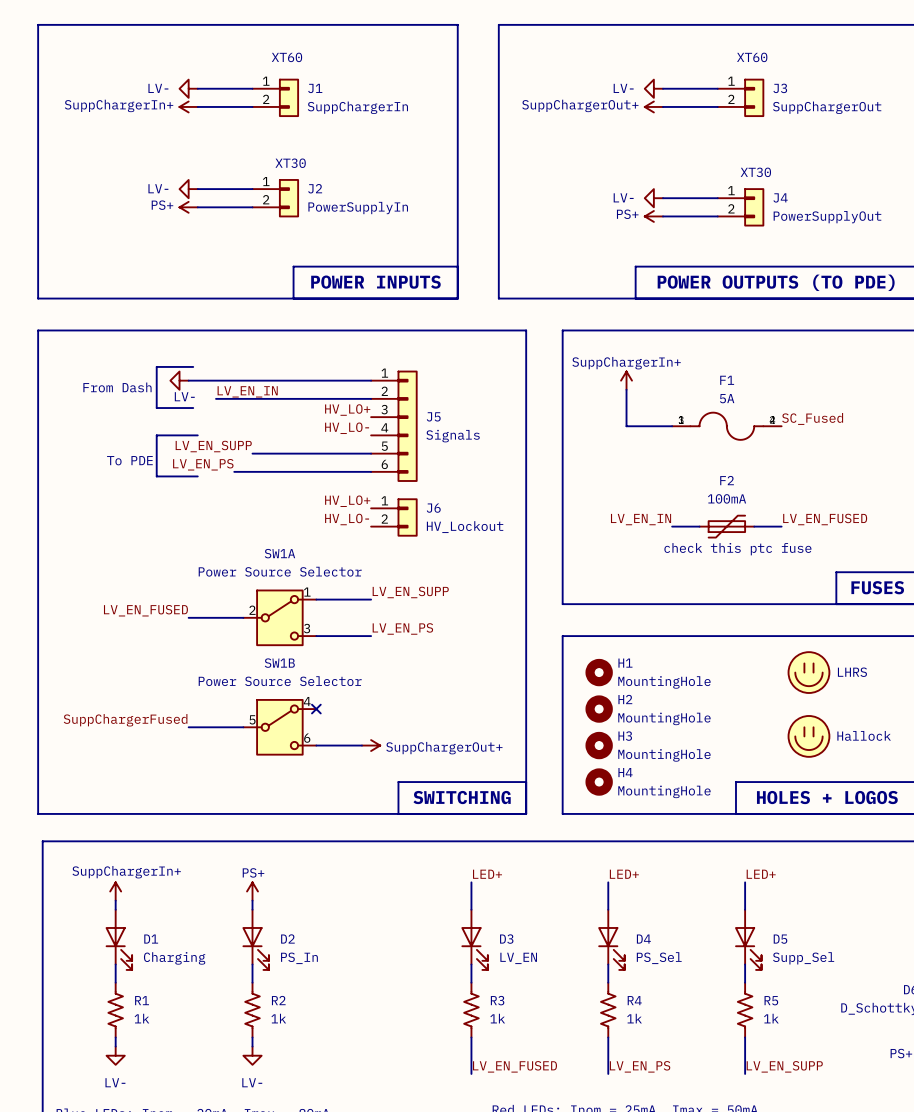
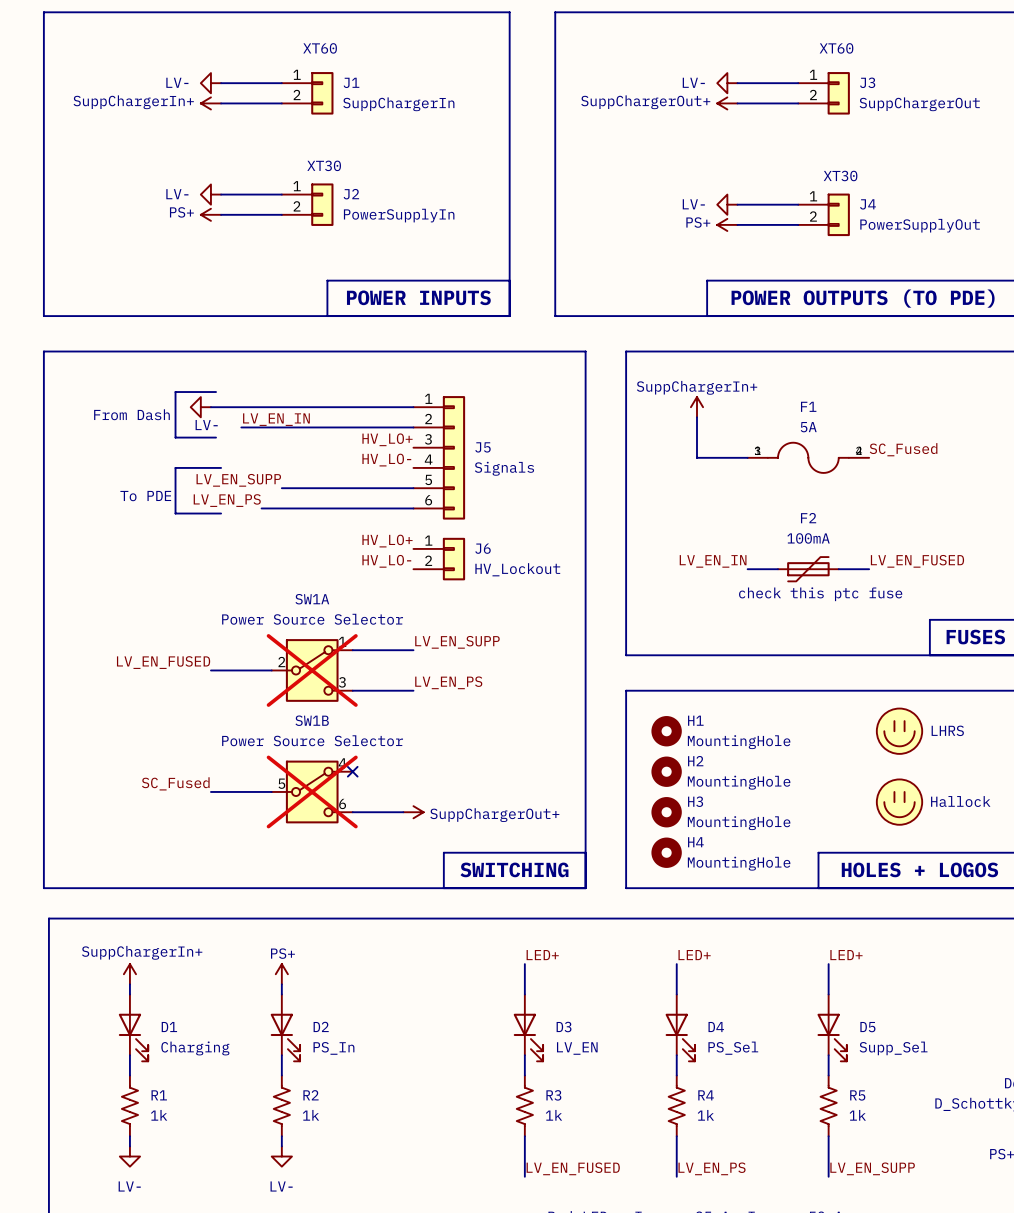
SW1A do-not-place cross: none -> (312, 670)
label: SuppChargerFused (125, 720) -> SC_Fused (175, 783)
SW1B do-not-place cross: none -> (312, 791)

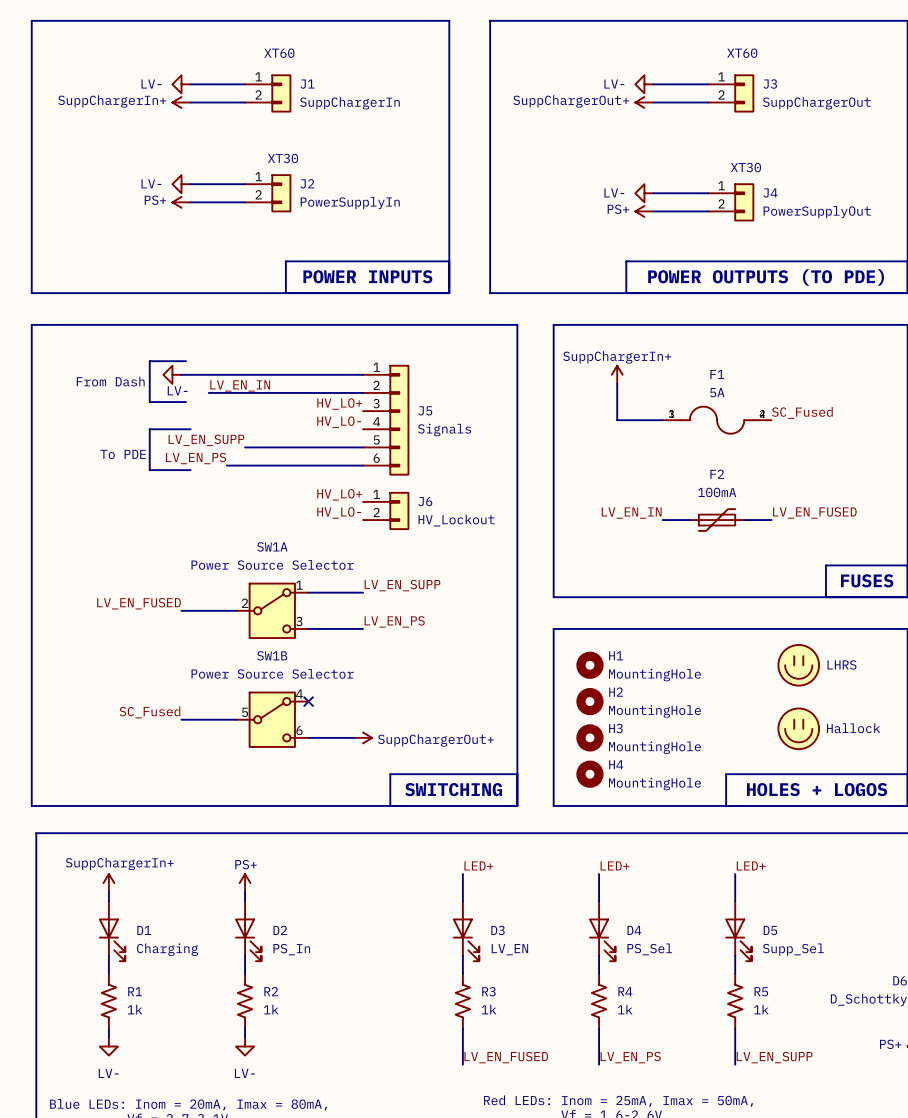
text: check this ptc fuse (820, 594) -> none
SW1A do-not-place cross: (312, 670) -> none
SW1B do-not-place cross: (312, 791) -> none

